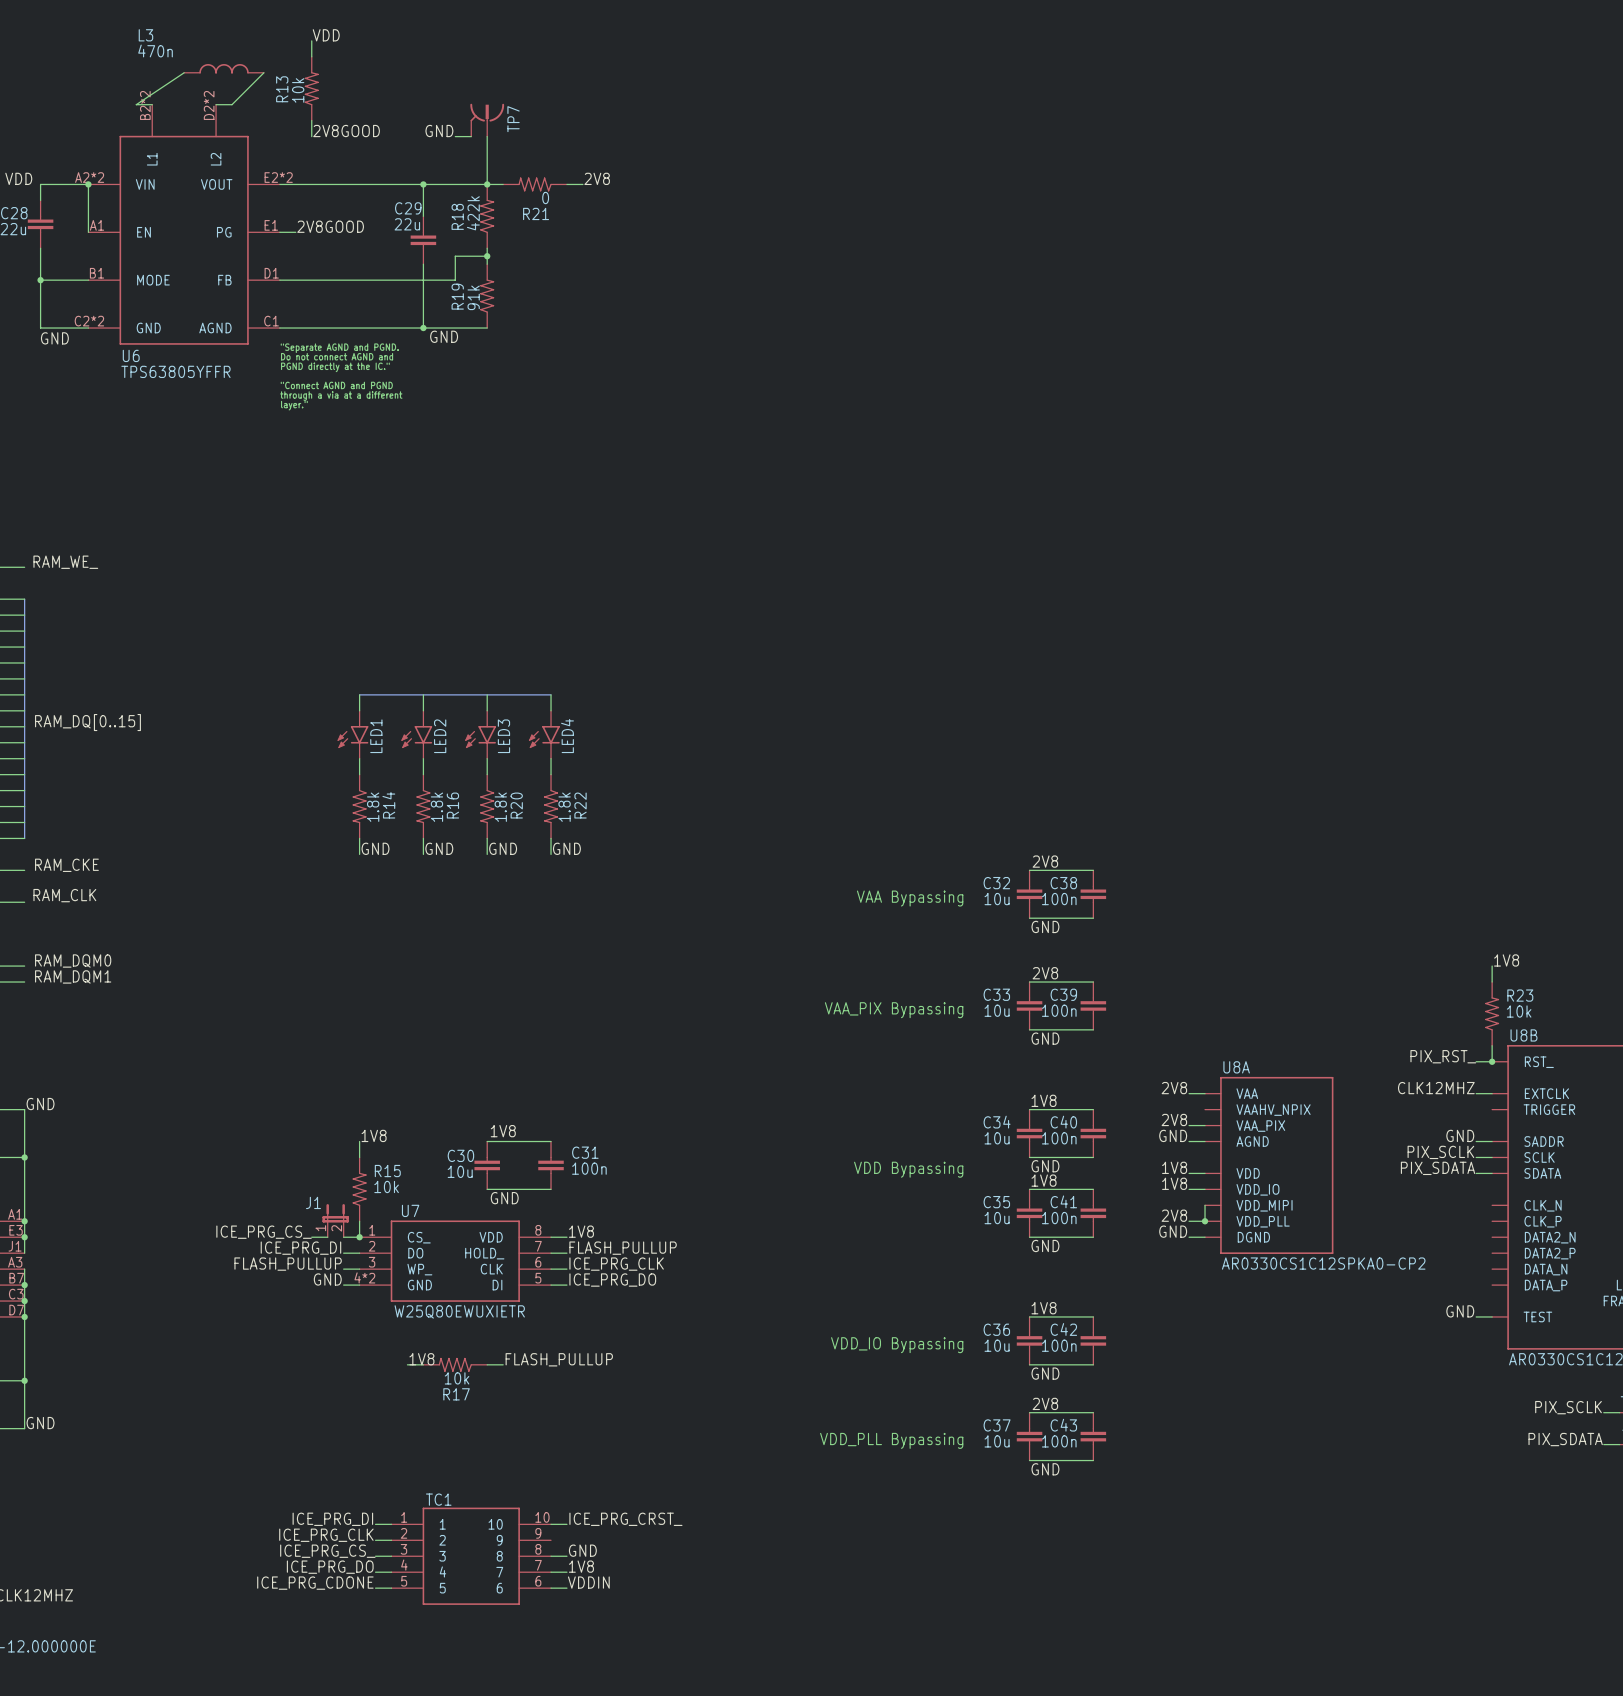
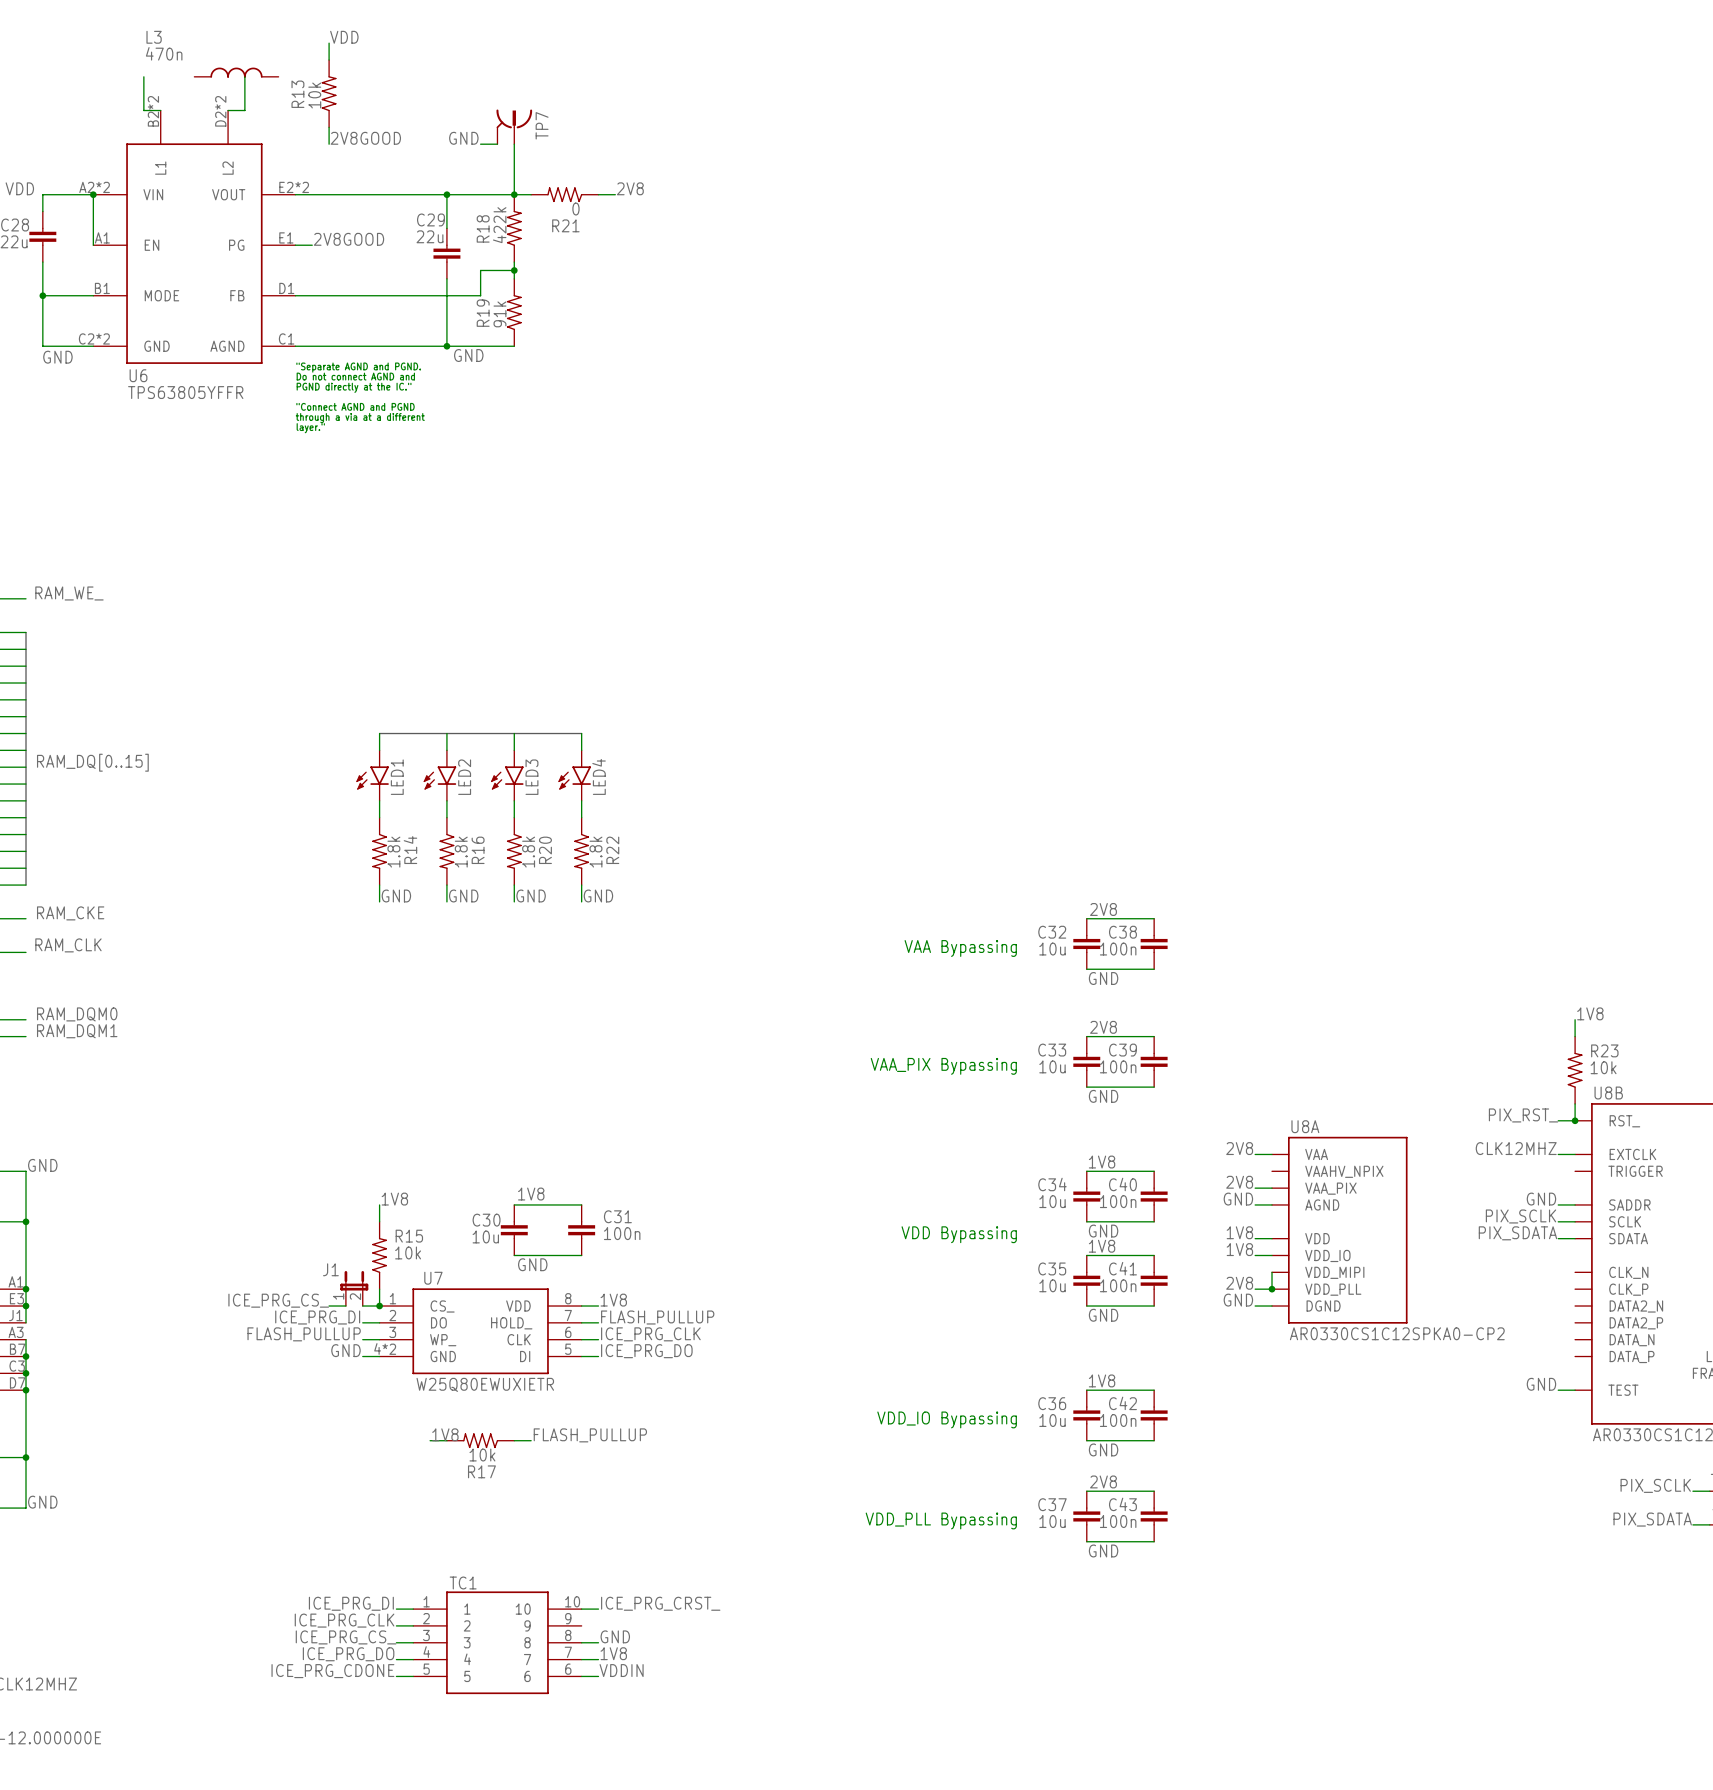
wire: (184, 72) (136, 104) -> (143, 76) (143, 110)
wire: (263, 72) (231, 104) -> (244, 76) (244, 110)

